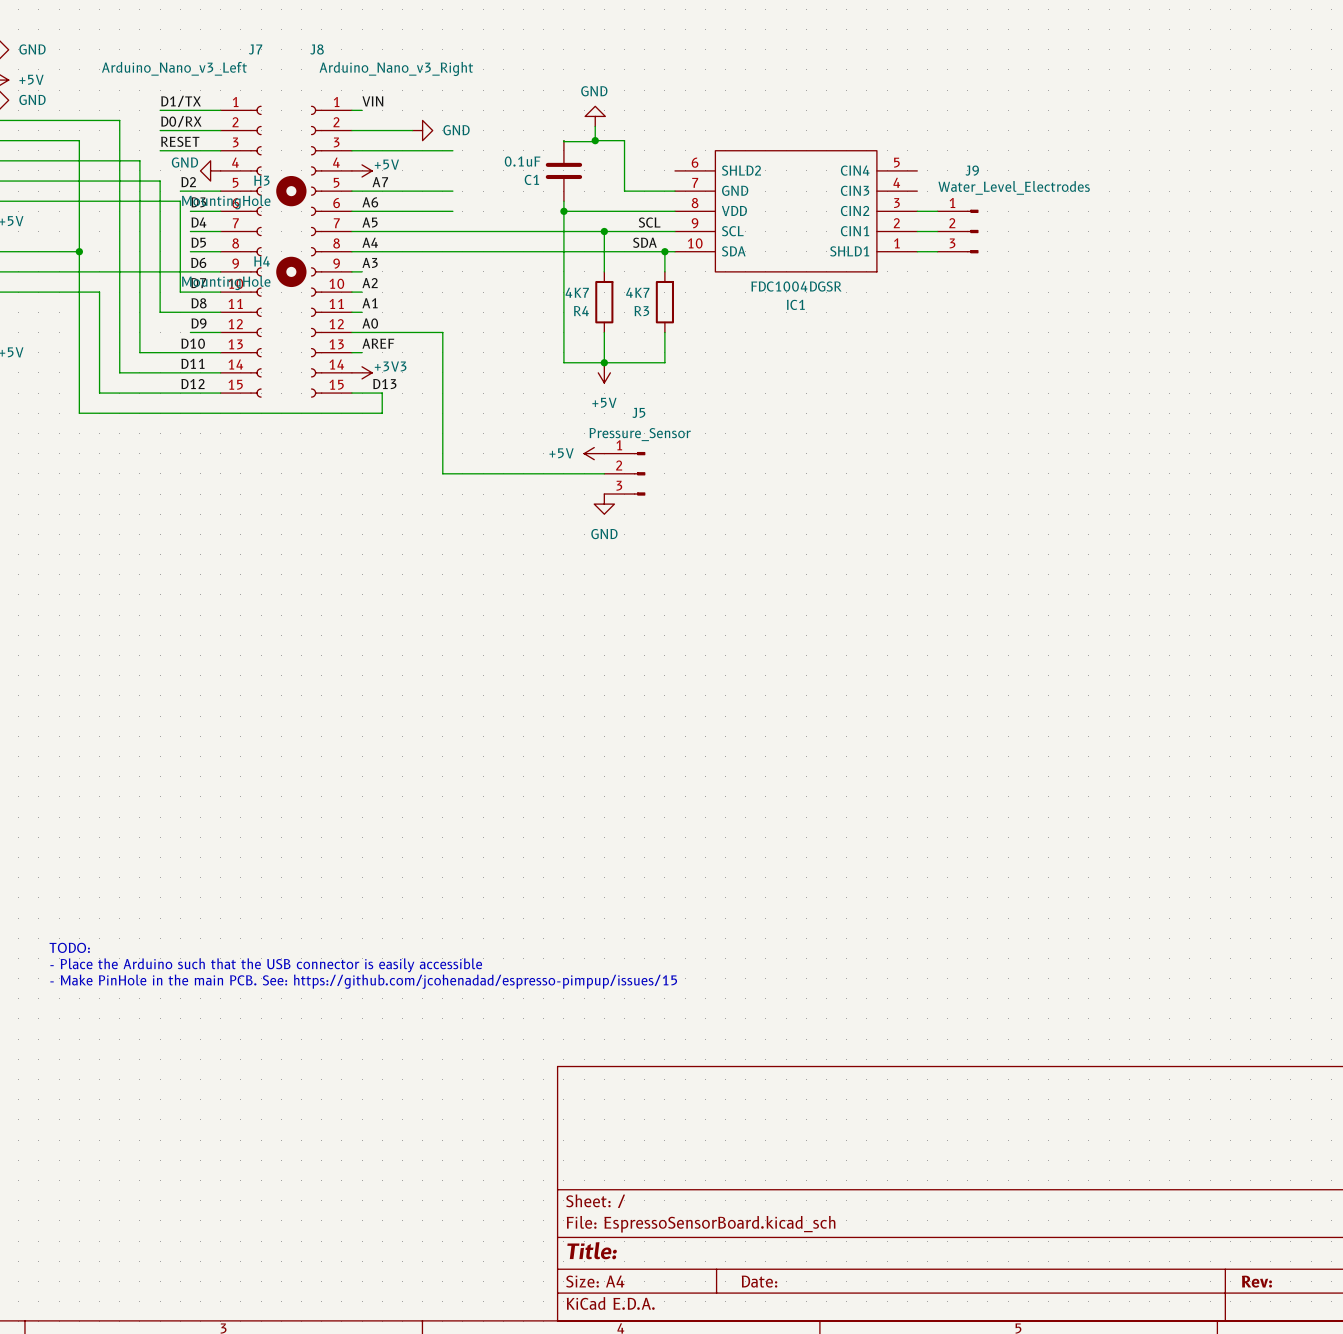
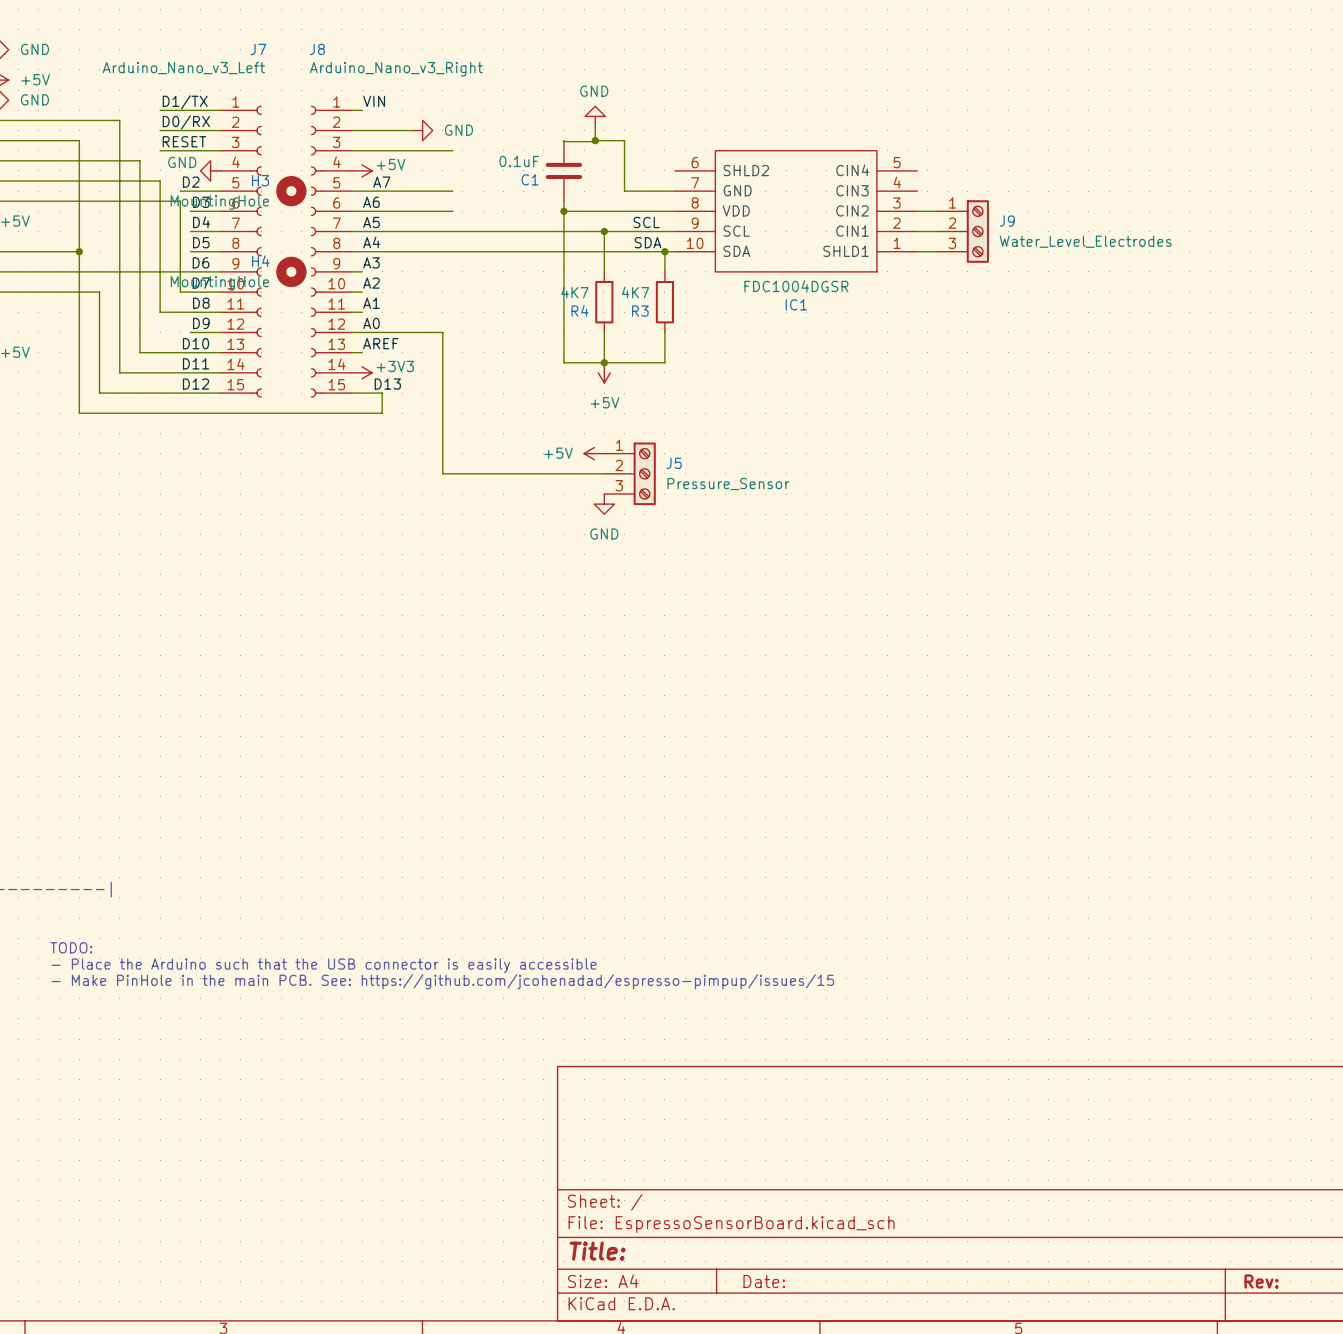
J9 name position: J9 (972, 170) -> J9 (1007, 221)
J9 value position: Water_Level_Electrodes (1014, 187) -> Water_Level_Electrodes (1085, 241)
J9 symbol: [937, 209, 979, 254] -> [937, 200, 989, 263]
J5 name position: J5 (638, 412) -> J5 (674, 463)
J5 value position: Pressure_Sensor (640, 434) -> Pressure_Sensor (728, 484)
J5 symbol: [604, 452, 646, 496] -> [604, 442, 656, 506]

